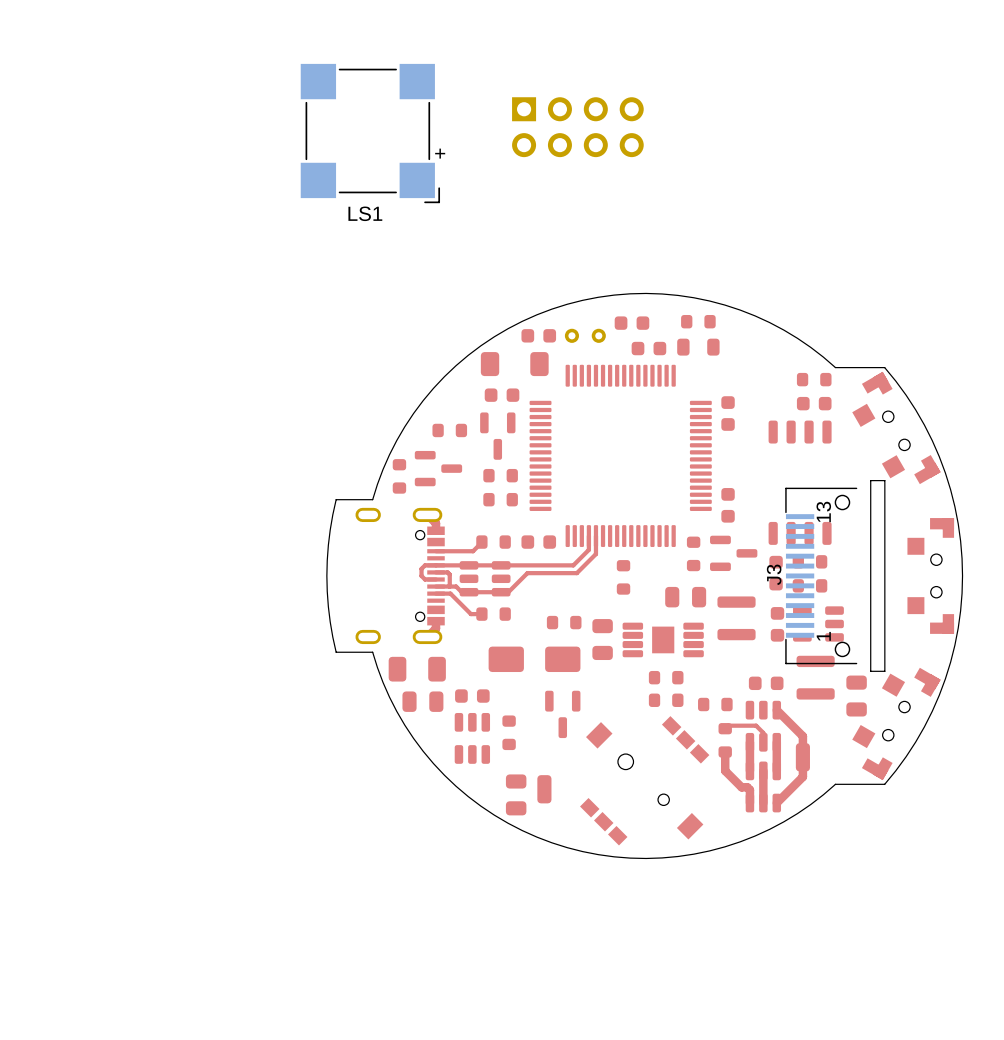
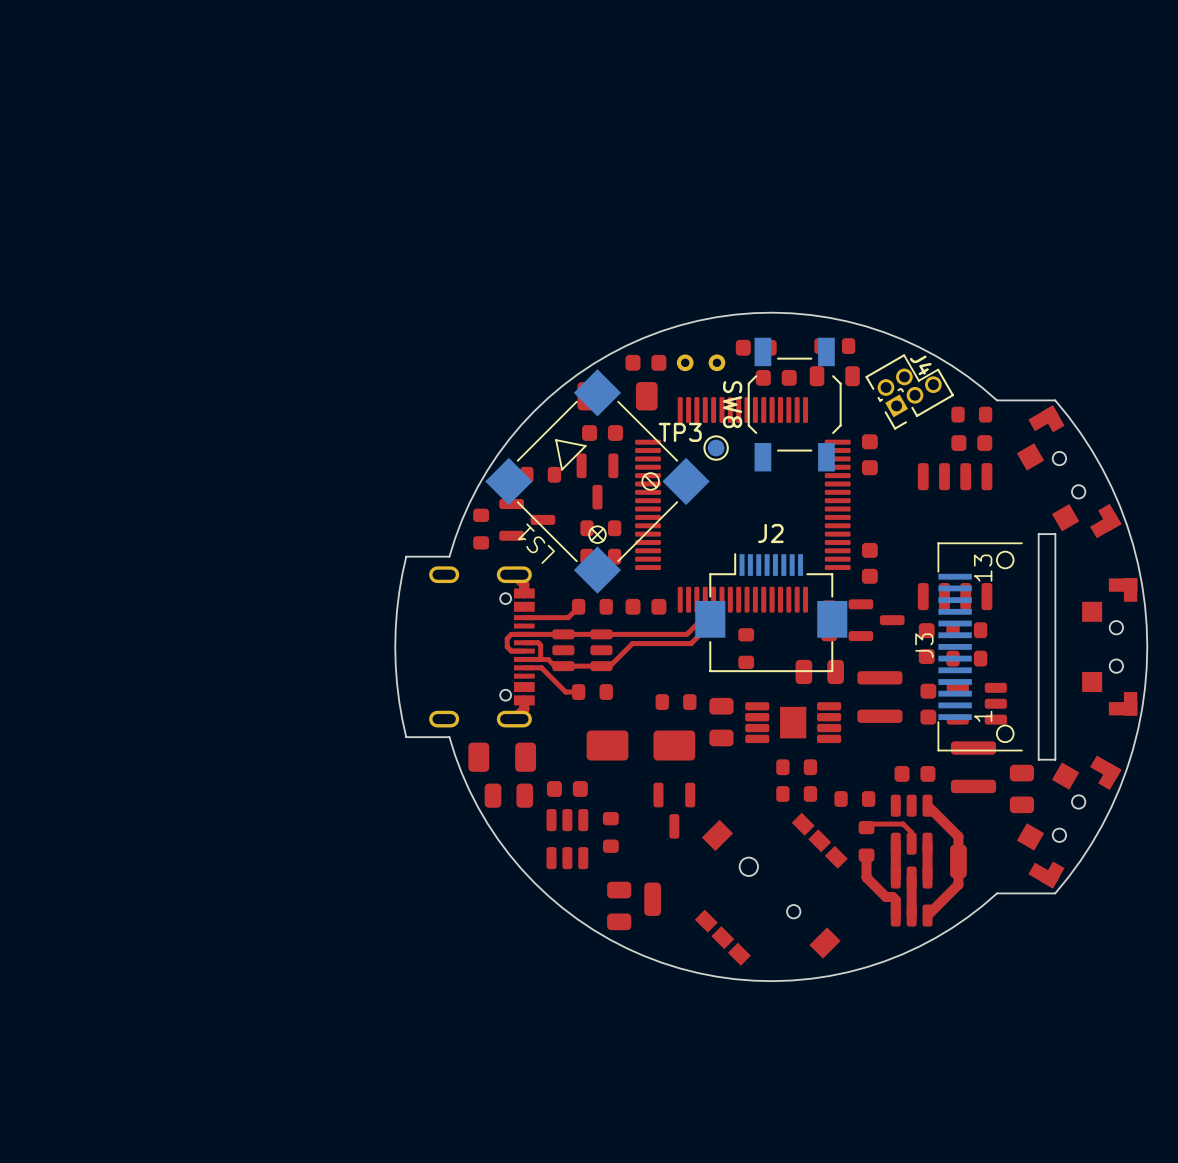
LS1 footprint: [300, 63, 441, 204] -> [485, 369, 710, 594]
part: (577, 127) -> none
LS1 name position: LS1 (365, 213) -> LS1 (536, 543)
J4: none -> (909, 391)
SW8: none -> (794, 404)
TP3: none -> (716, 448)
J2: none -> (771, 612)

